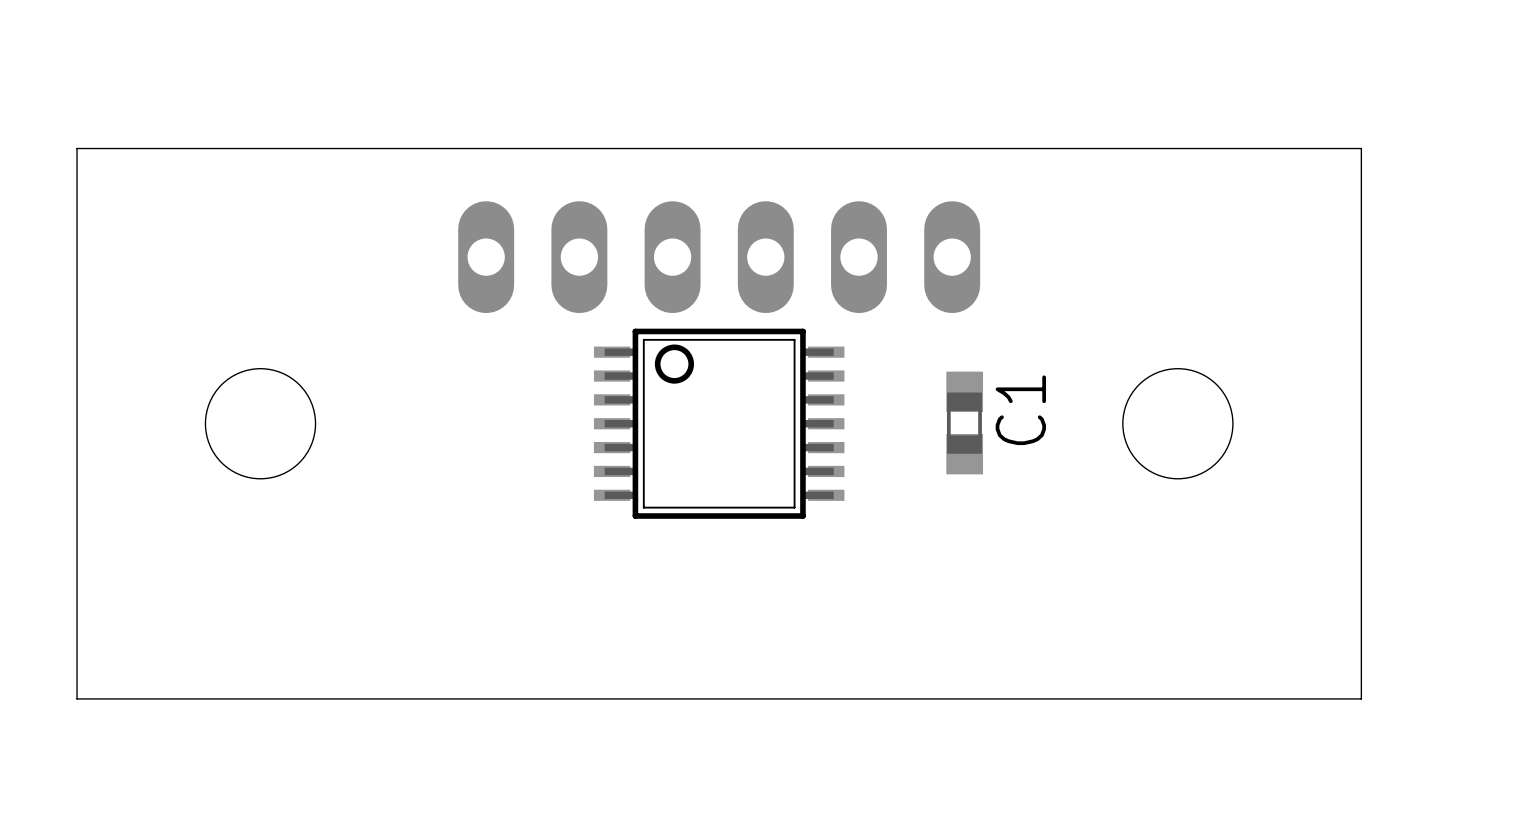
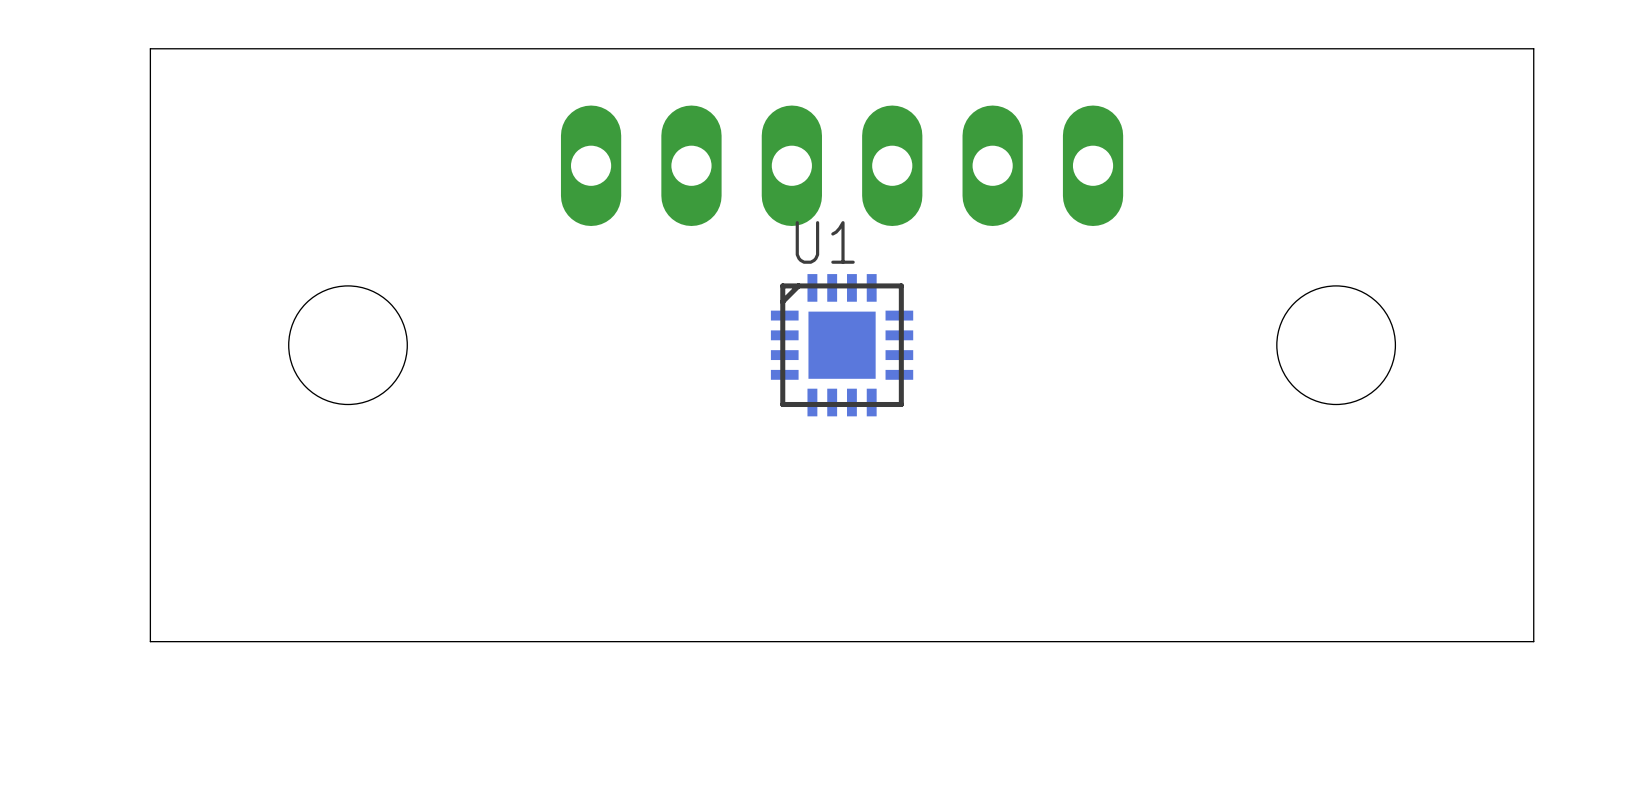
part: (719, 423) -> none
U1: none -> (842, 345)
C1: (964, 423) -> none

